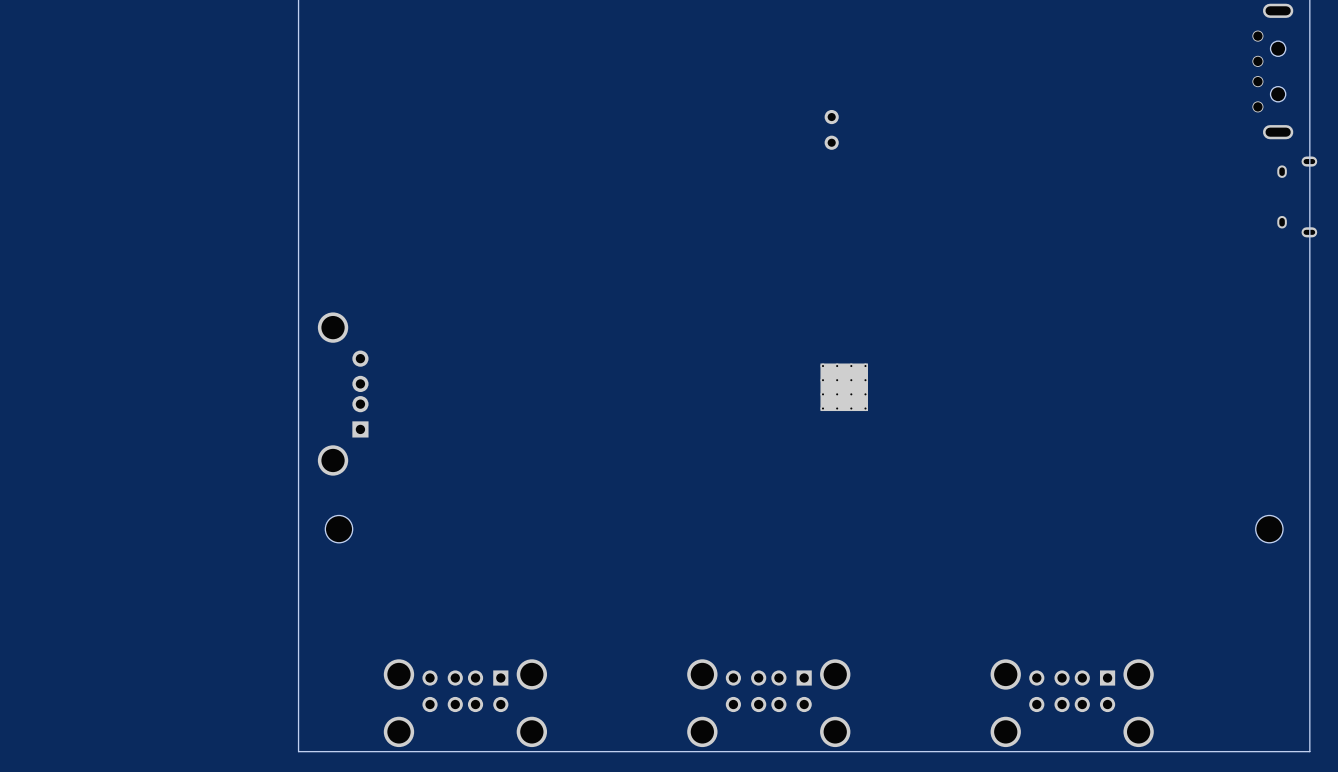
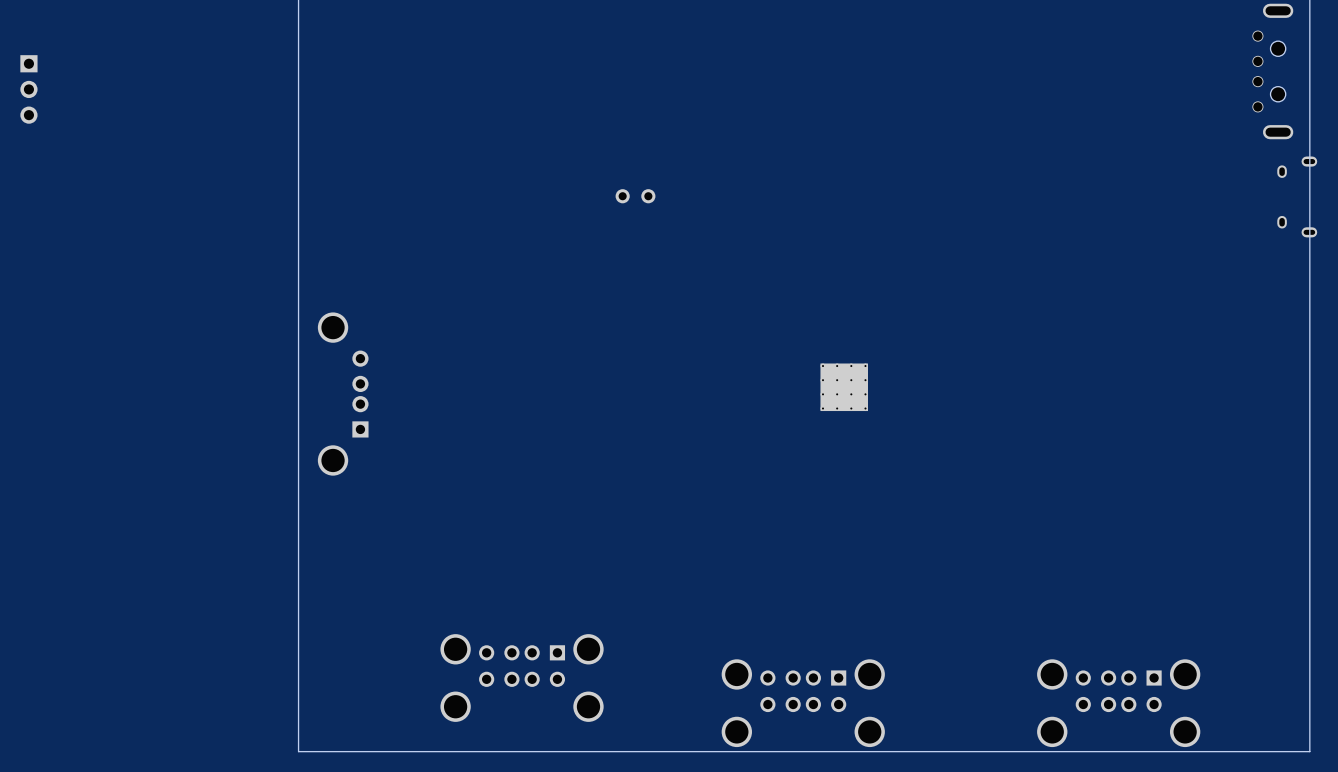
part: none -> (28, 89)
part rotation: 0° (831, 129) -> 90° clockwise (635, 196)
part position: (831, 129) -> (635, 196)
part: (339, 529) -> none
part: (1269, 529) -> none
part position: (465, 703) -> (522, 678)
part position: (768, 703) -> (803, 703)
part position: (1072, 703) -> (1118, 703)

